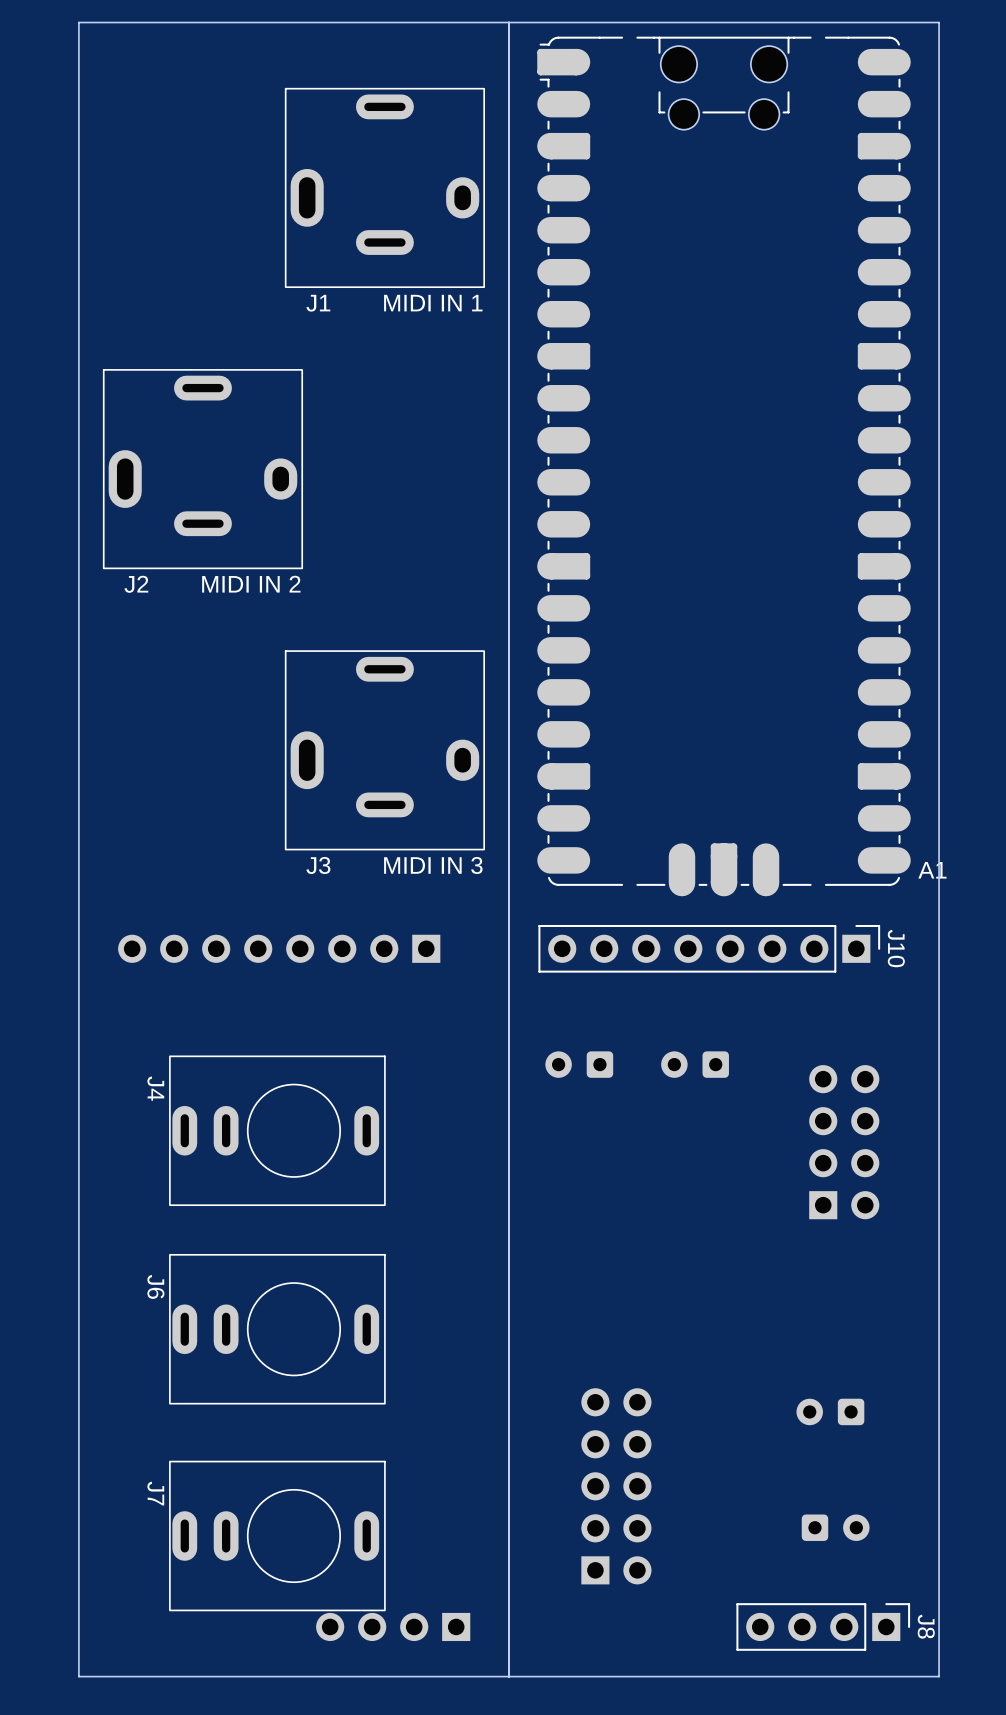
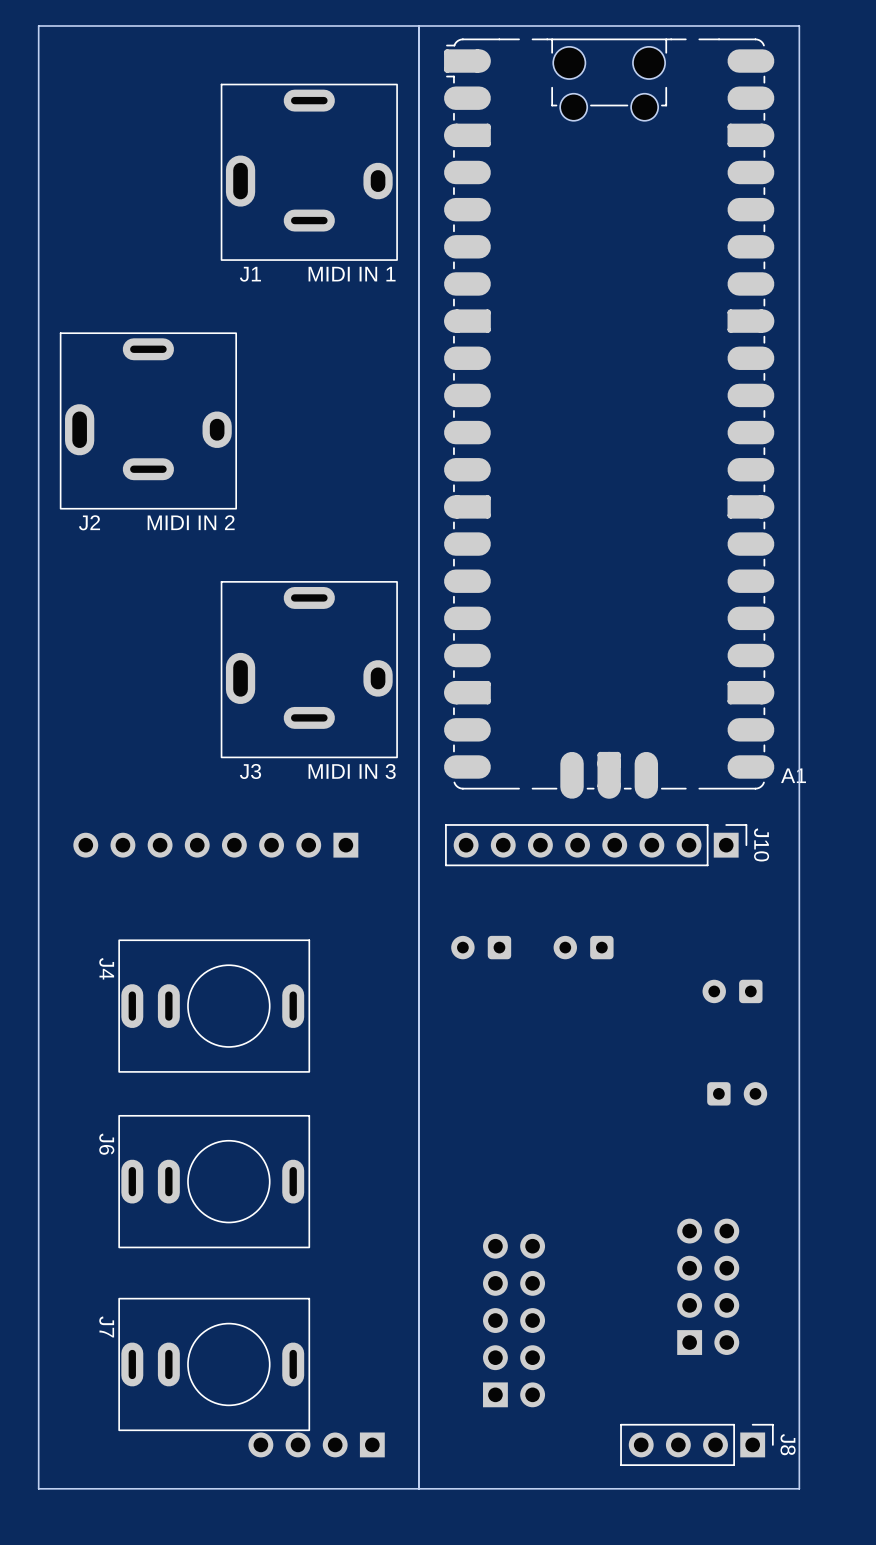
part: none -> (732, 991)
part position: (844, 1142) -> (708, 1286)
part: none -> (737, 1093)
part: (830, 1411) -> none
part: (835, 1527) -> none

